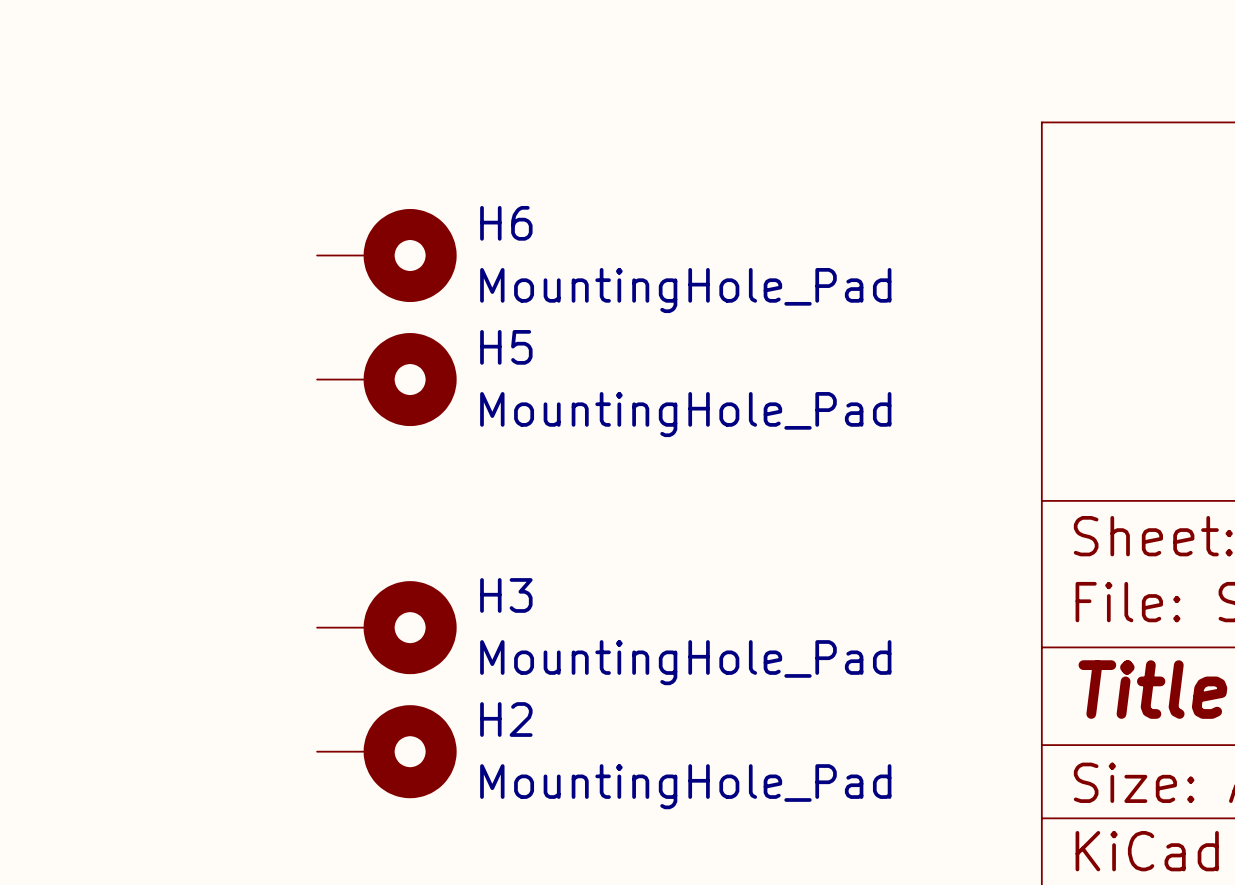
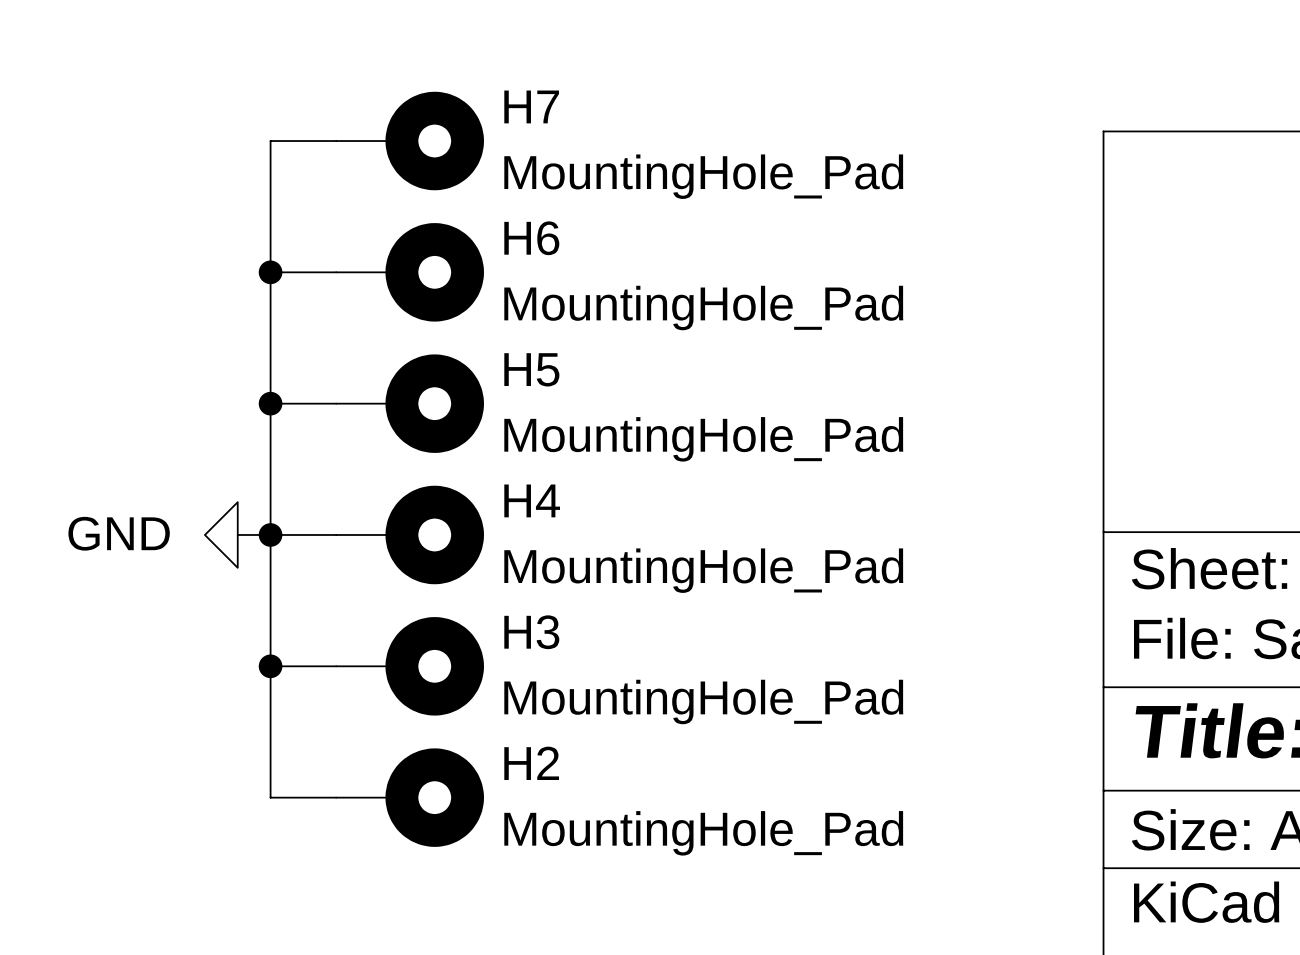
wire: none -> (336, 141) (270, 141) (270, 797) (336, 797)
H7: none -> MountingHole_Pad (410, 141)
wire: none -> (270, 272) (336, 272)
junction: none -> (270, 272)
wire: none -> (270, 403) (336, 403)
junction: none -> (270, 403)
power symbol: none -> GND (237, 534)
wire: none -> (270, 534) (336, 534)
junction: none -> (270, 534)
H4: none -> MountingHole_Pad (410, 534)
wire: none -> (270, 666) (336, 666)
junction: none -> (270, 666)

